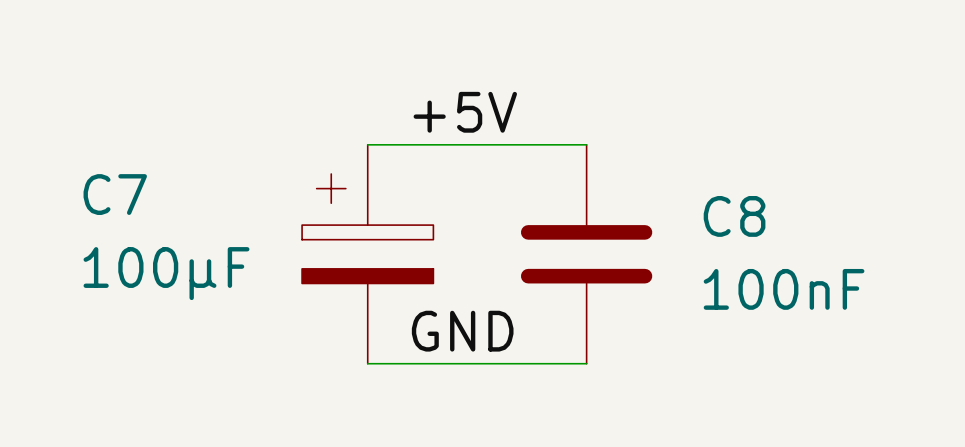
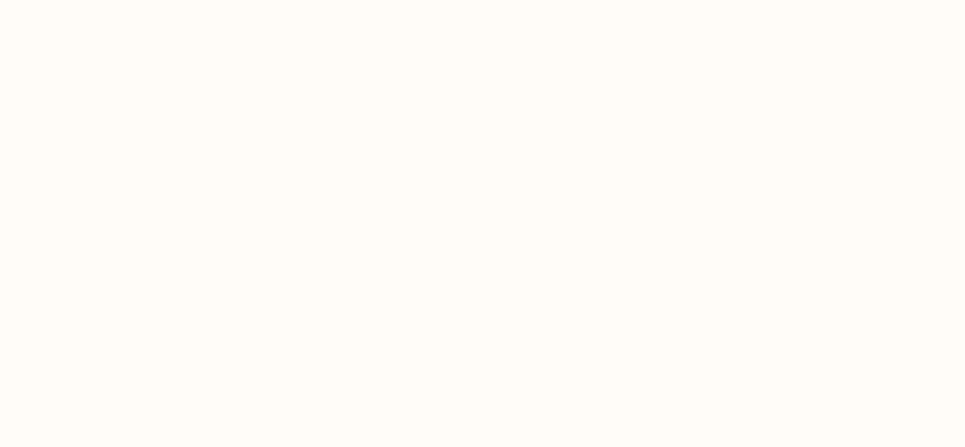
label: +5V (465, 112) -> none
wire: (367, 144) (586, 144) -> none
C7: 100µF (367, 254) -> none
C8: 100nF (586, 254) -> none
label: GND (462, 331) -> none
wire: (367, 363) (586, 363) -> none

